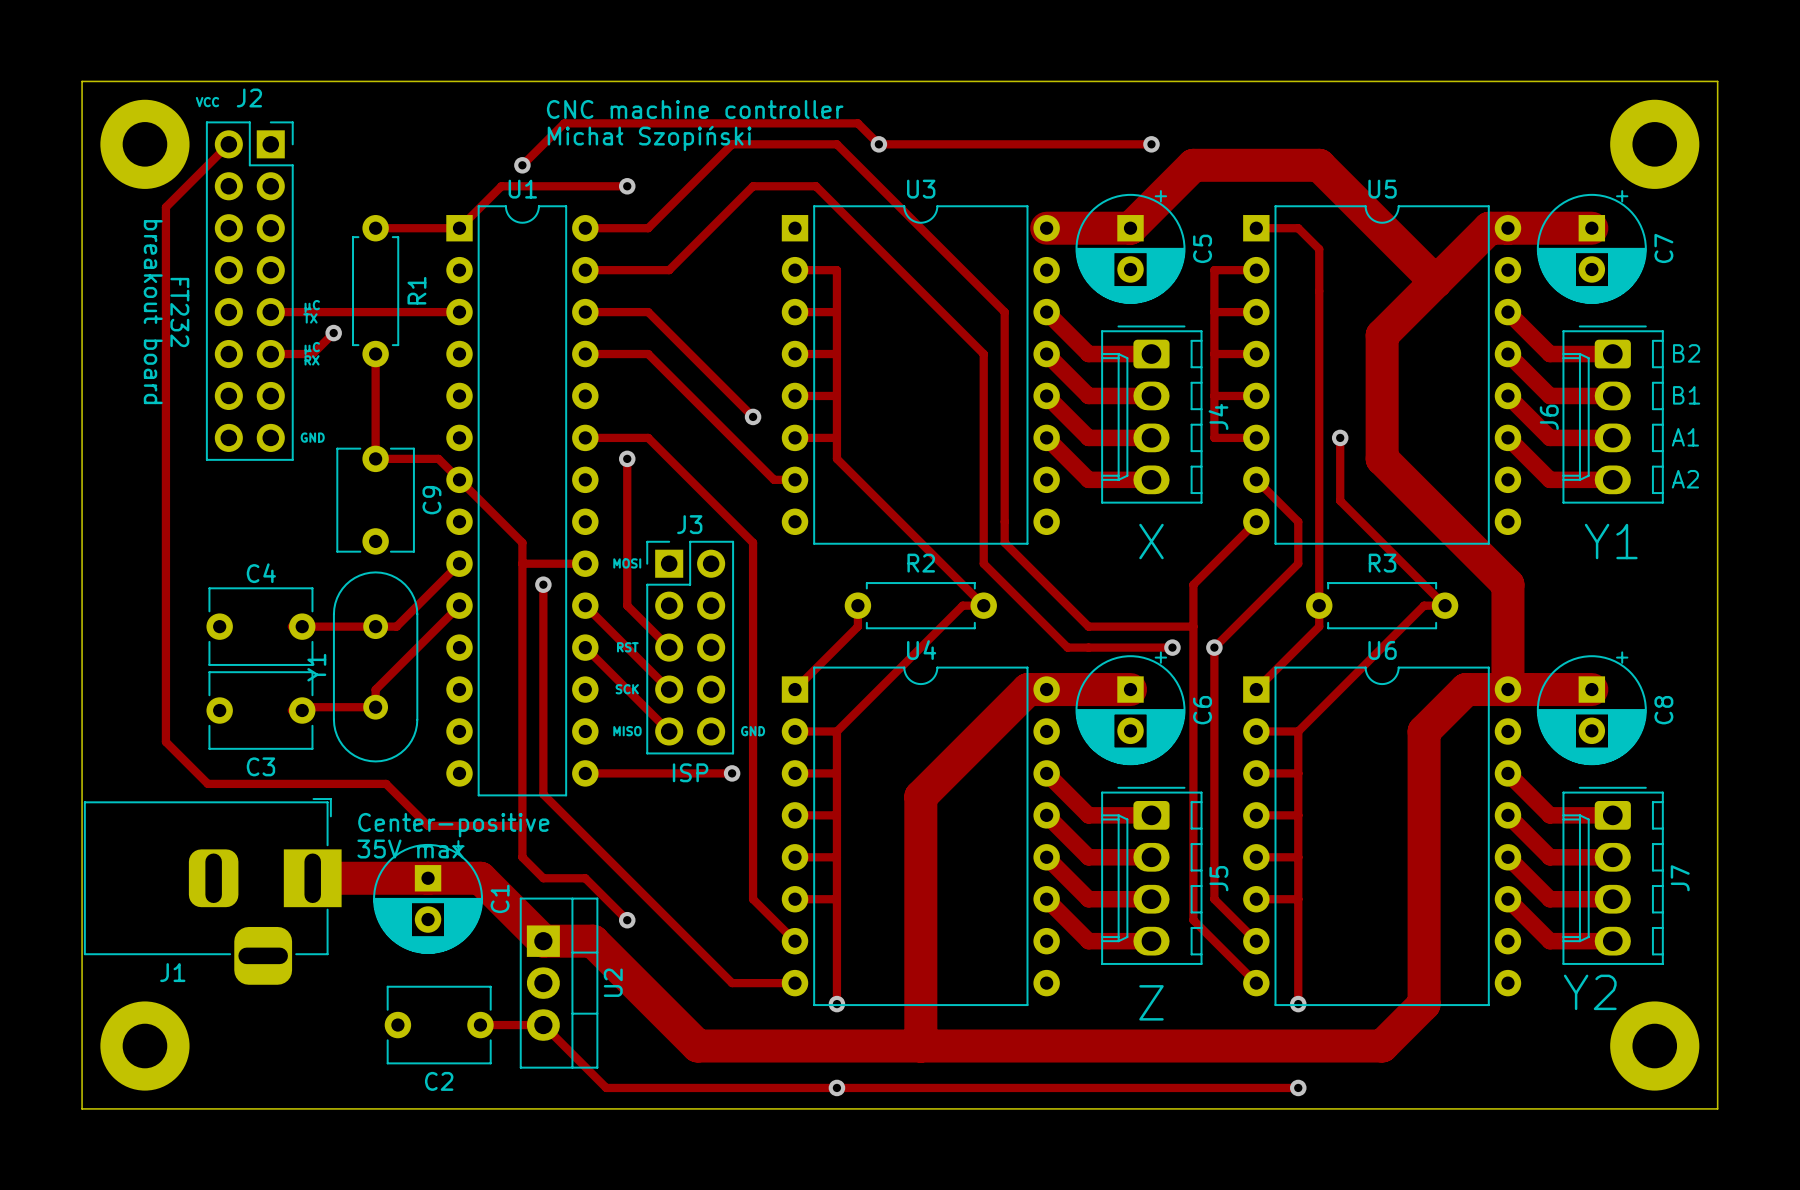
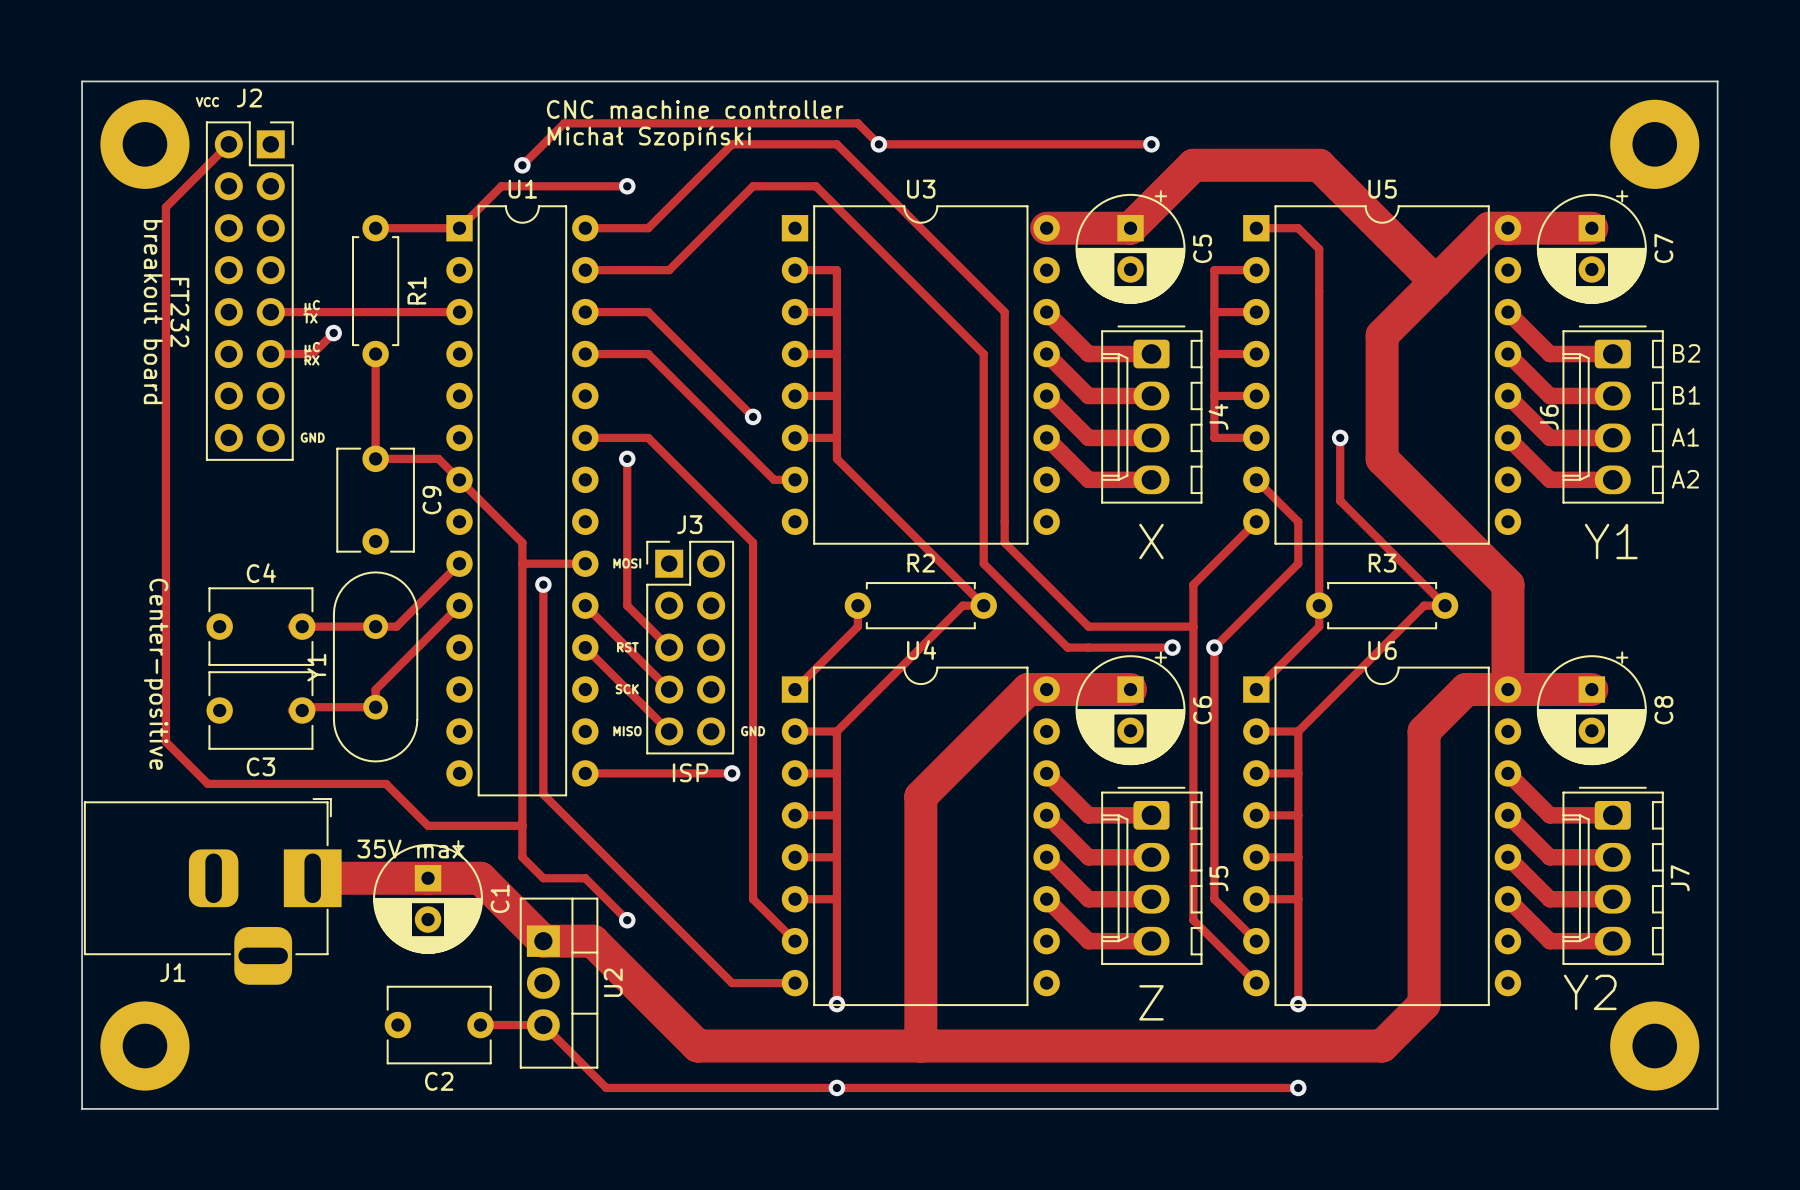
text rotation: 0° (453, 825) -> 90° clockwise (156, 674)
text position: Center-positive (453, 825) -> Center-positive (156, 674)

